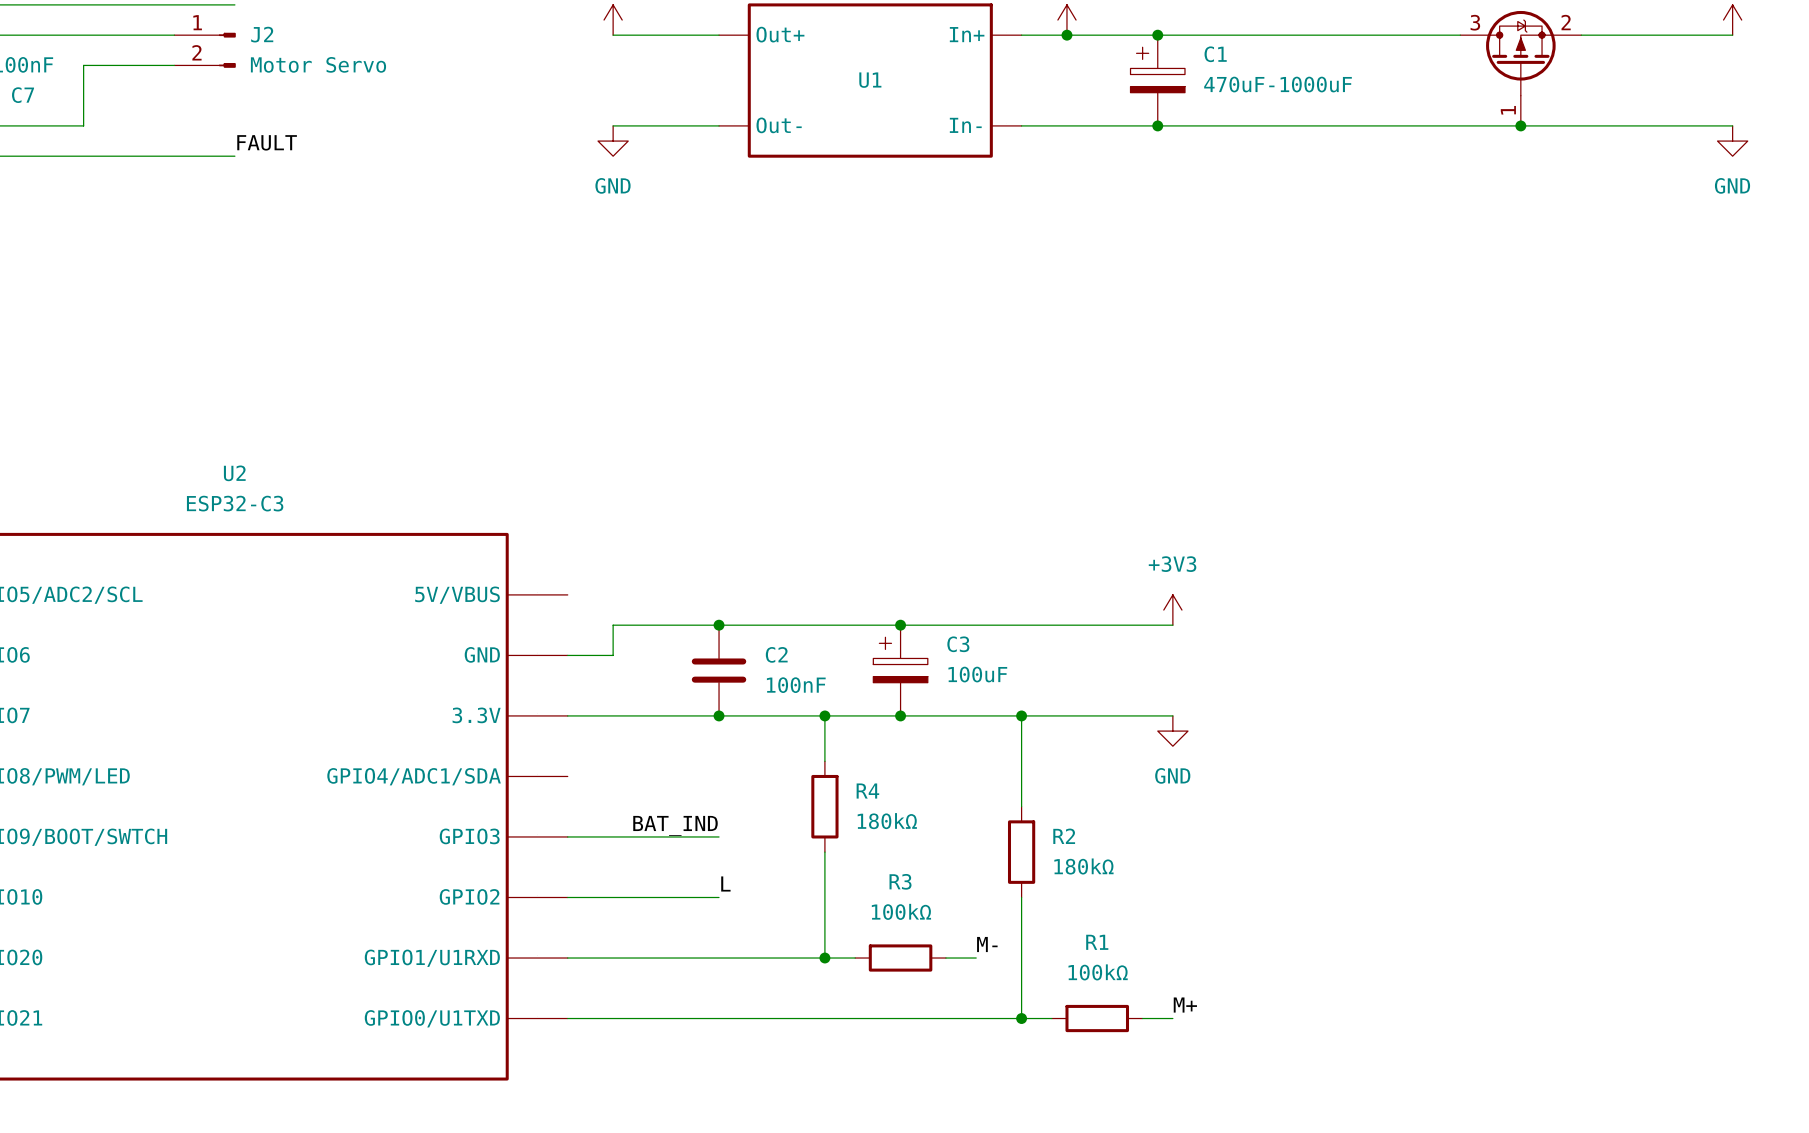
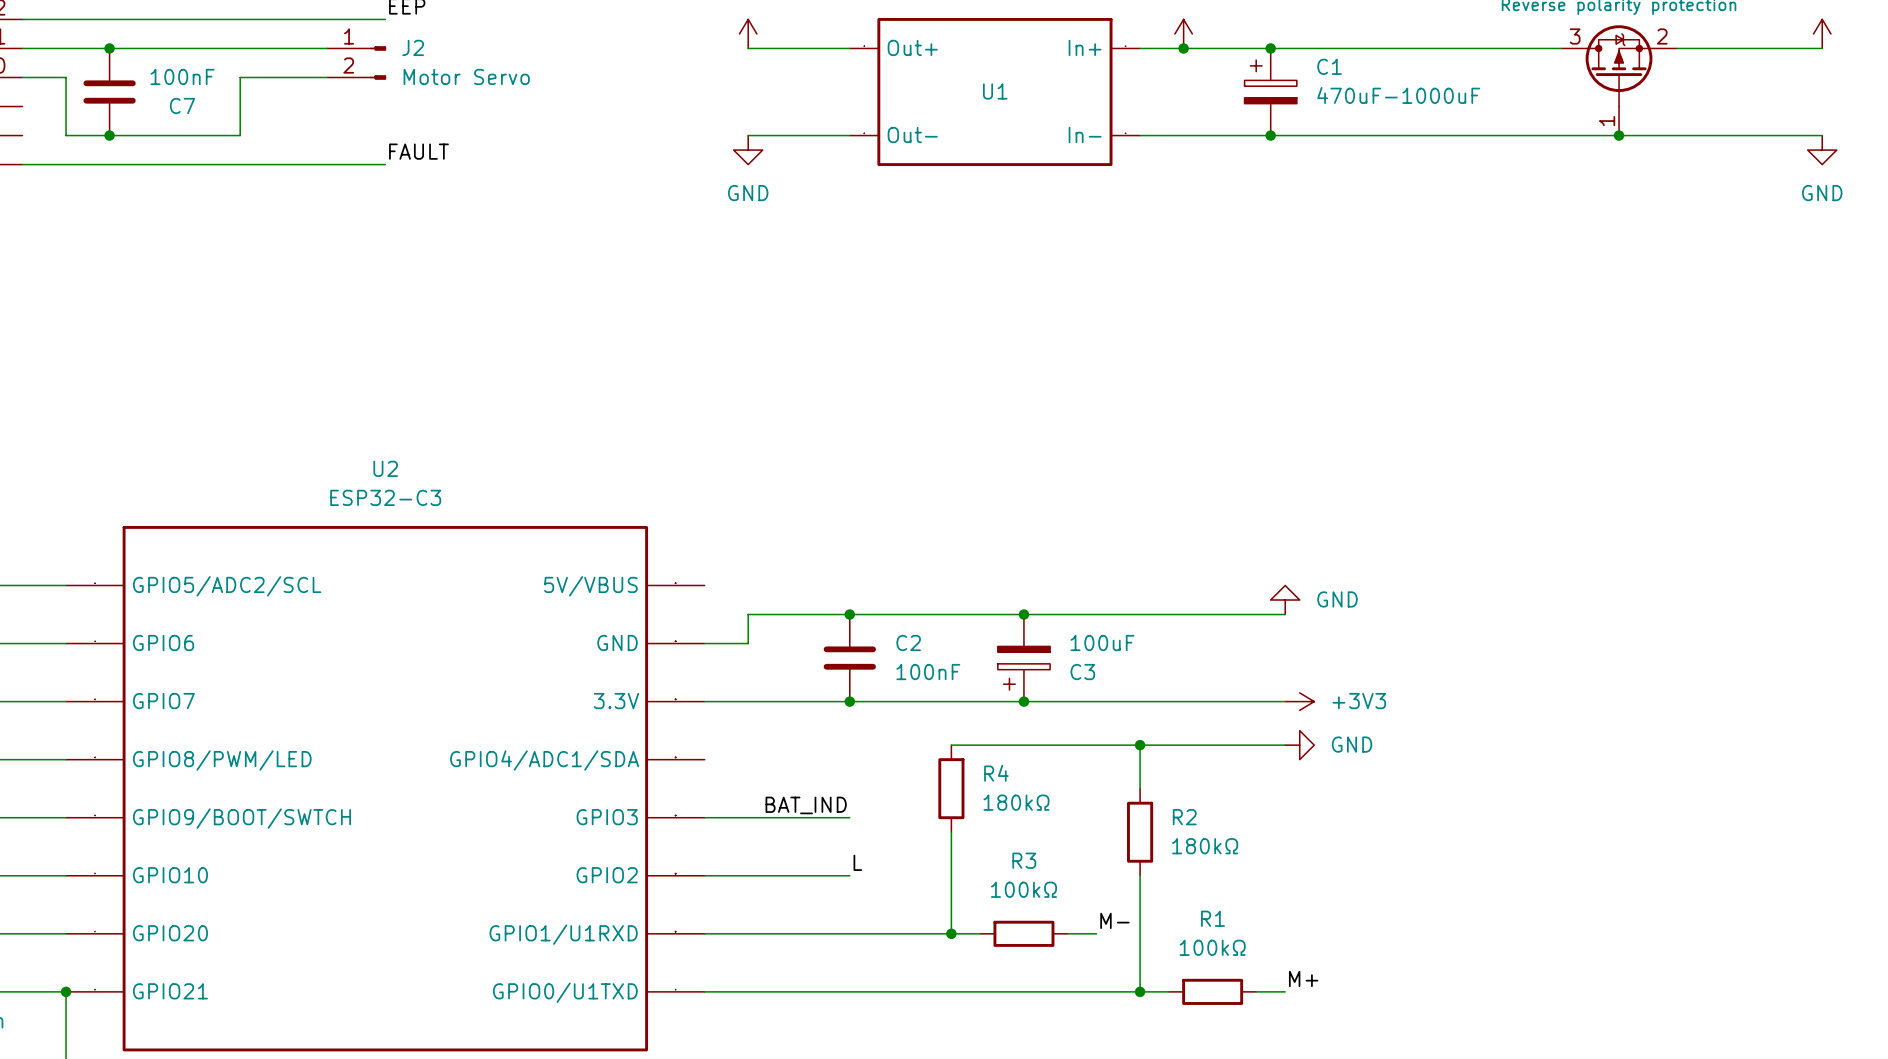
power symbol: +3V3 (1172, 610) -> GND (1285, 600)
C3 flip: as is (900, 659) -> up-down (1023, 668)
wire: (824, 715) (824, 761) -> (1285, 745) (951, 745)
junction: (824, 715) -> none
wire: (1021, 715) (1021, 761) -> none
junction position: (1021, 715) -> (1140, 745)
power symbol: none -> +3V3 (1299, 701)
power symbol rotation: 0° (1172, 731) -> 90° counterclockwise (1299, 745)
power symbol position: GND (1172, 731) -> GND (1299, 745)

